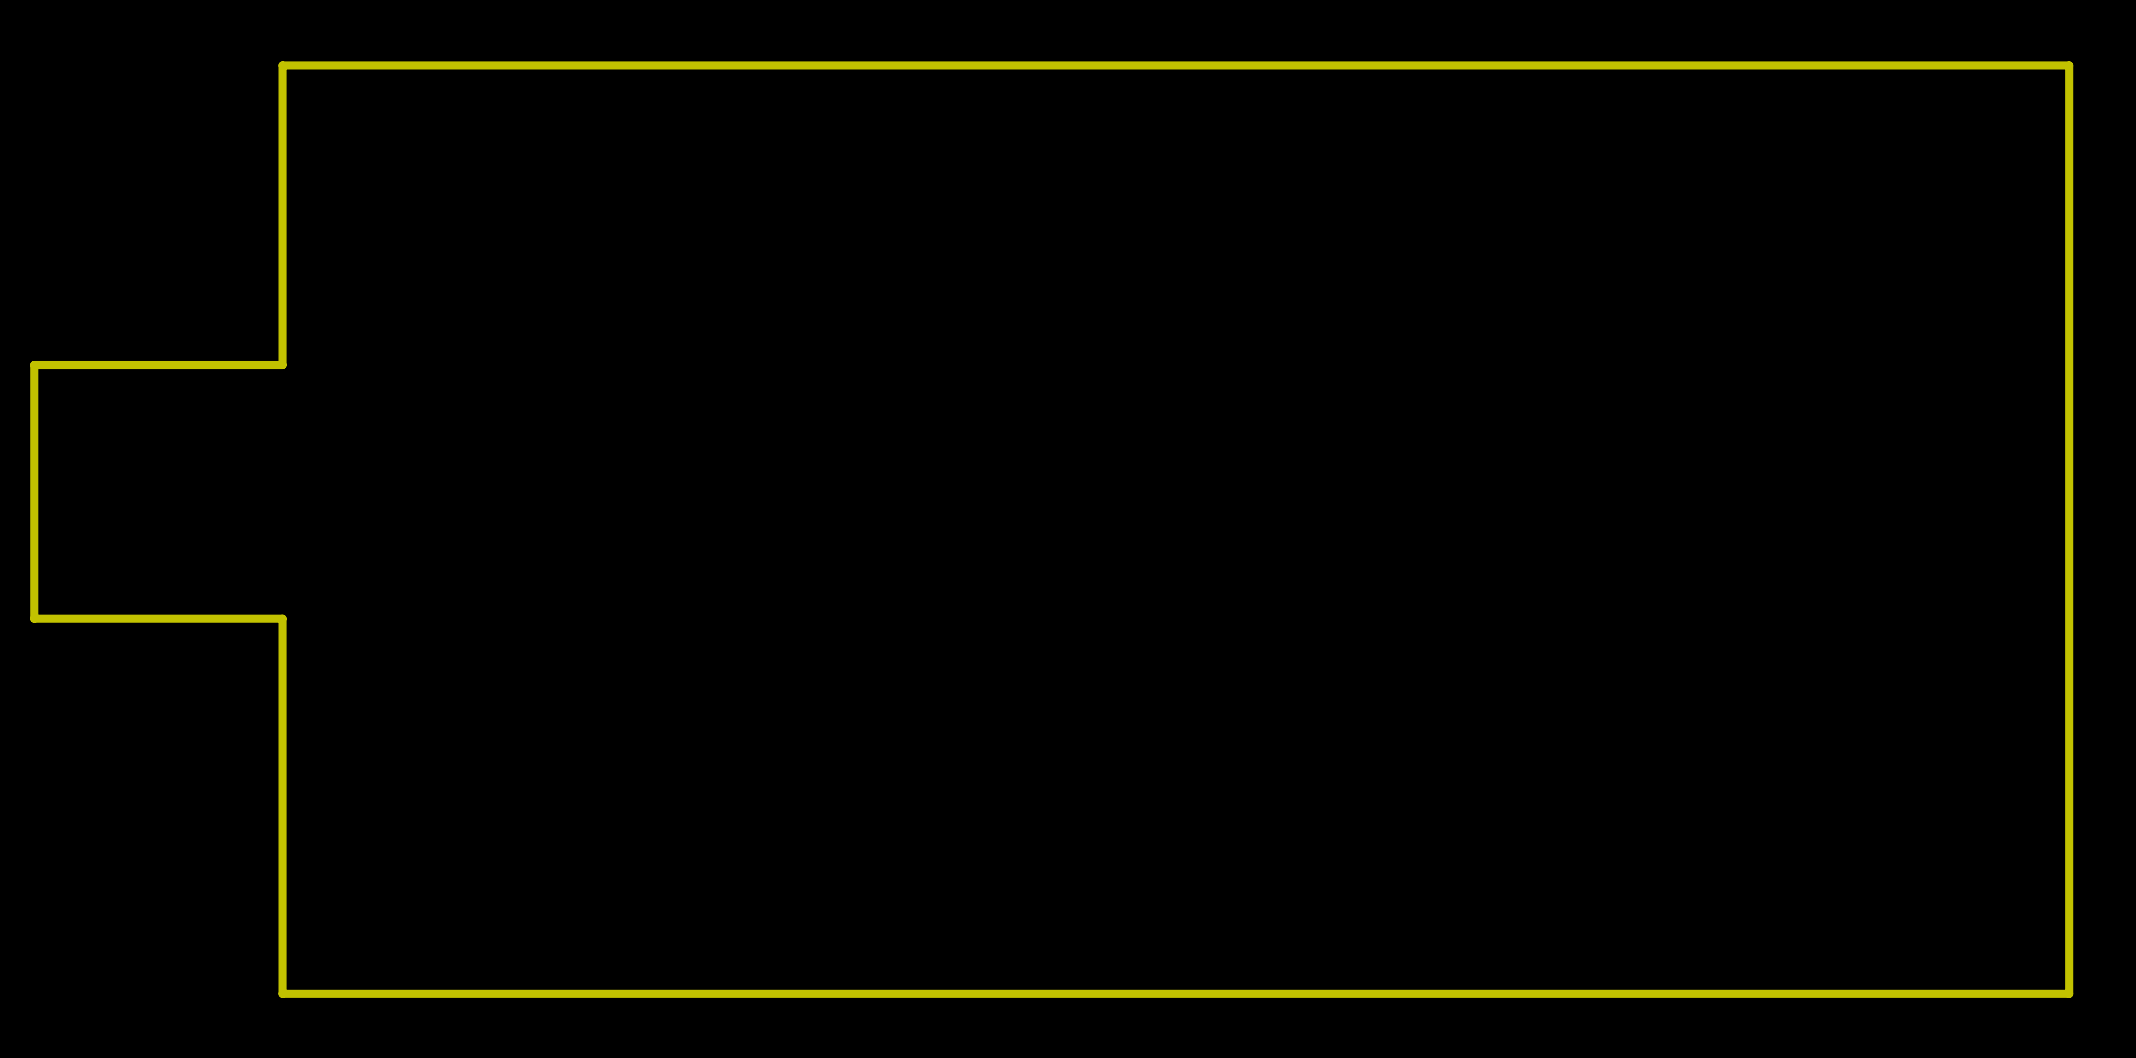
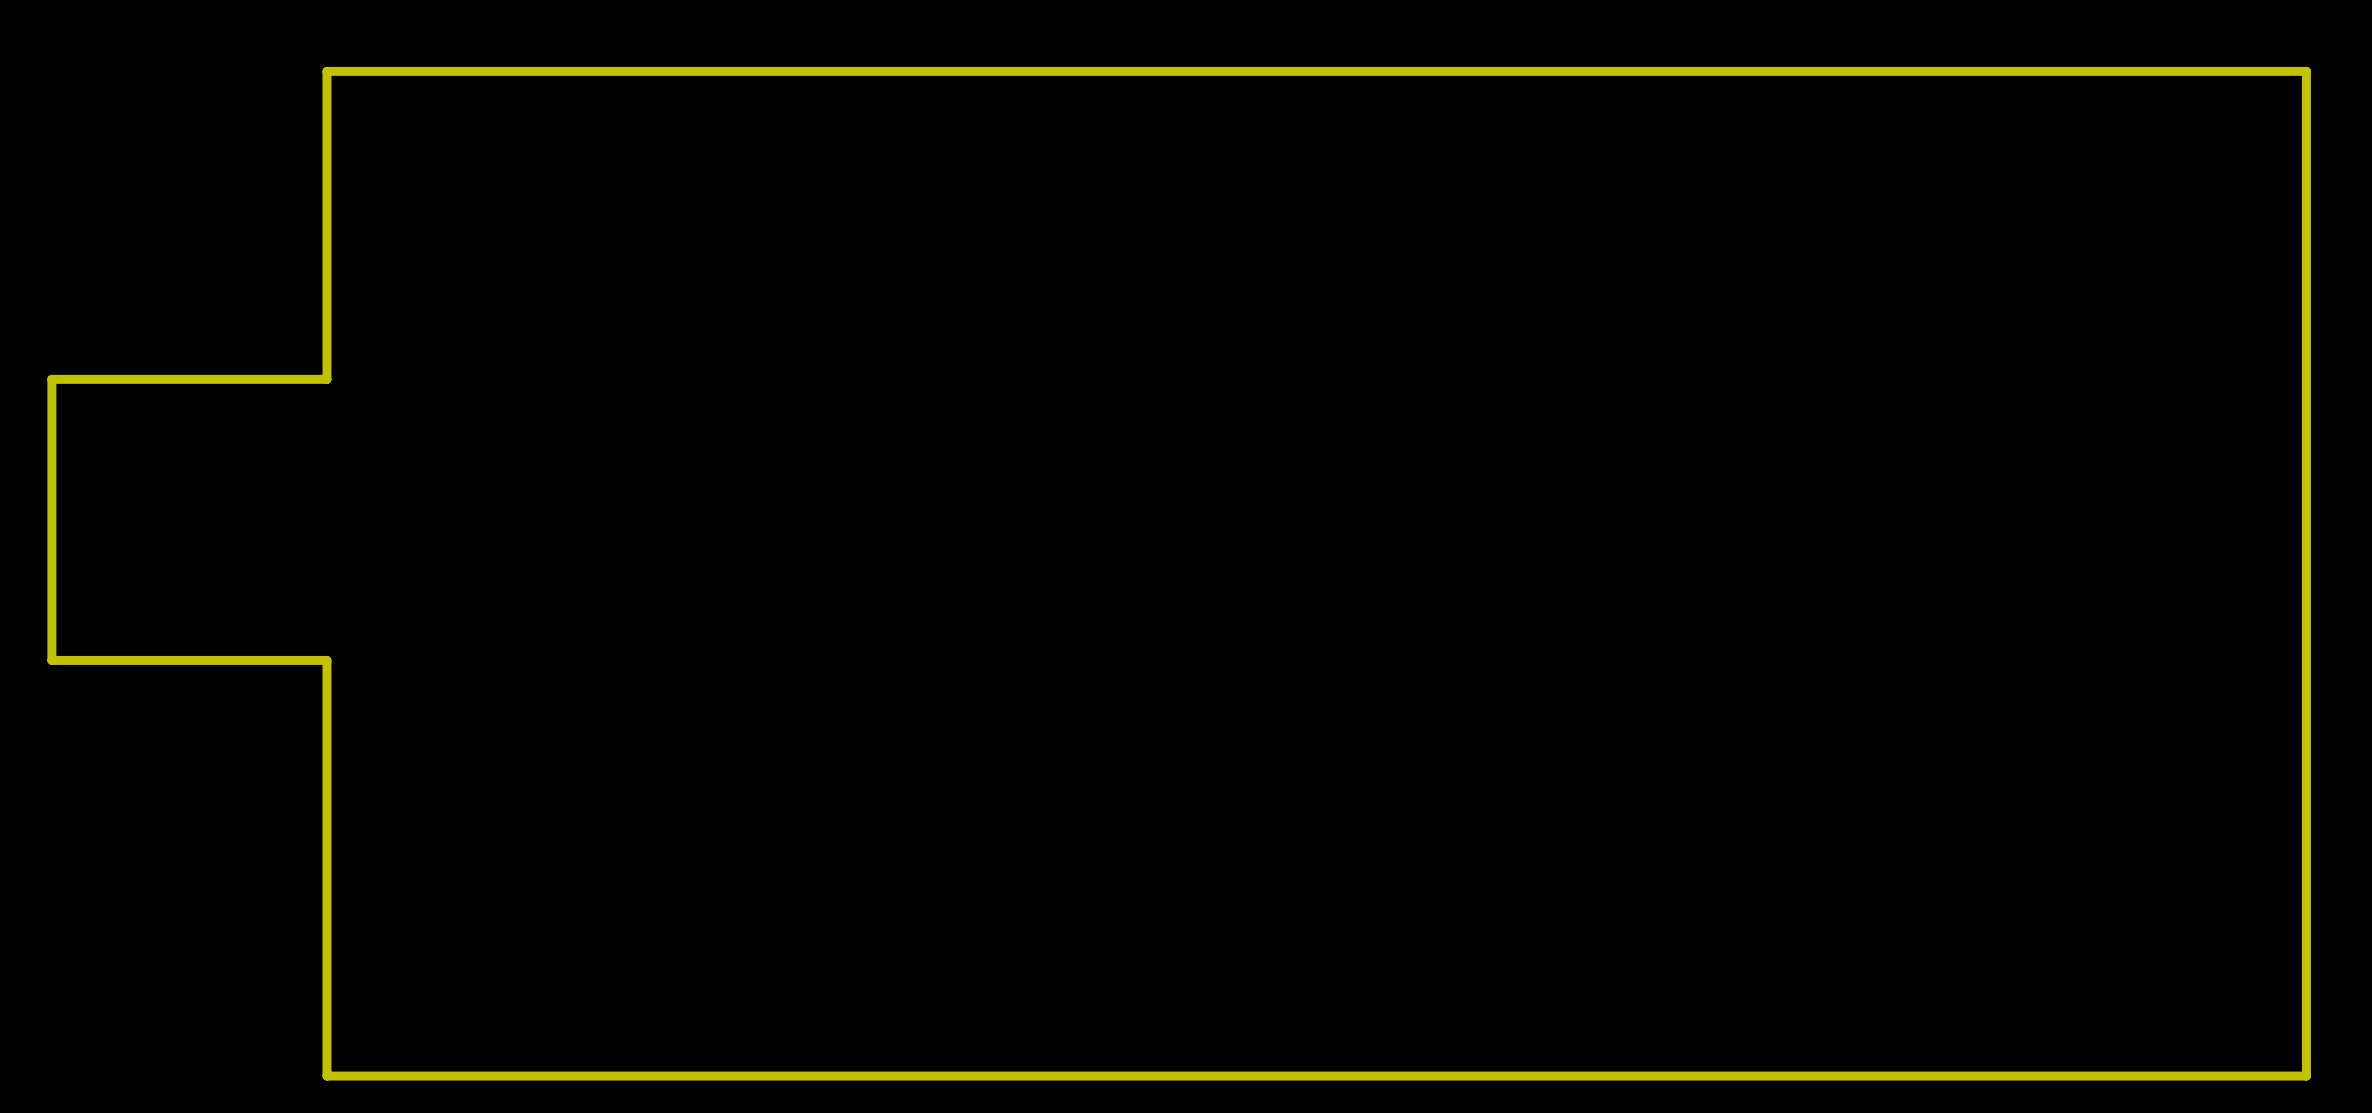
board edge: (2069, 87) (2069, 65) (282, 65) (282, 87) -> (2306, 71) (326, 71)

